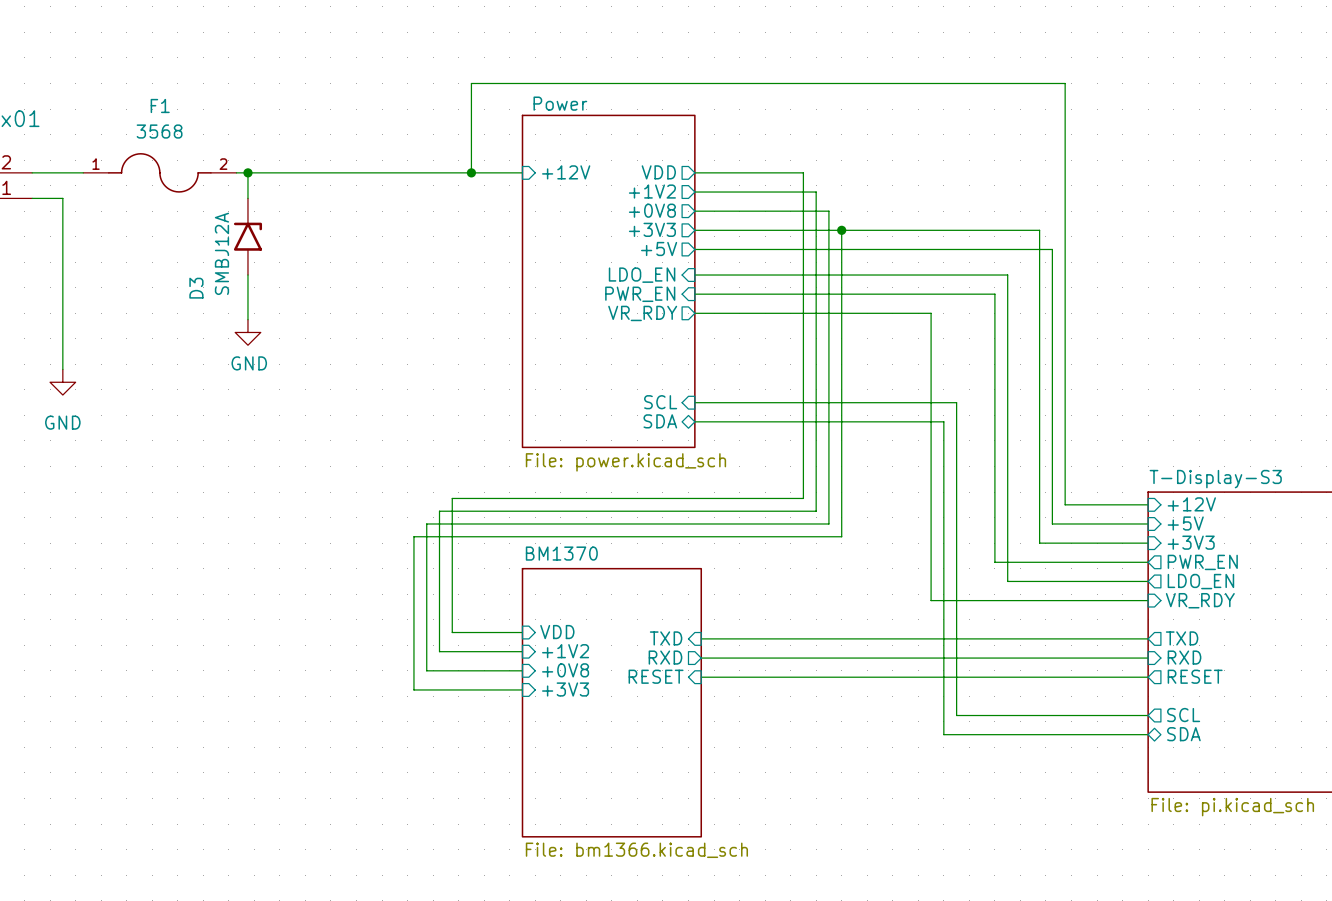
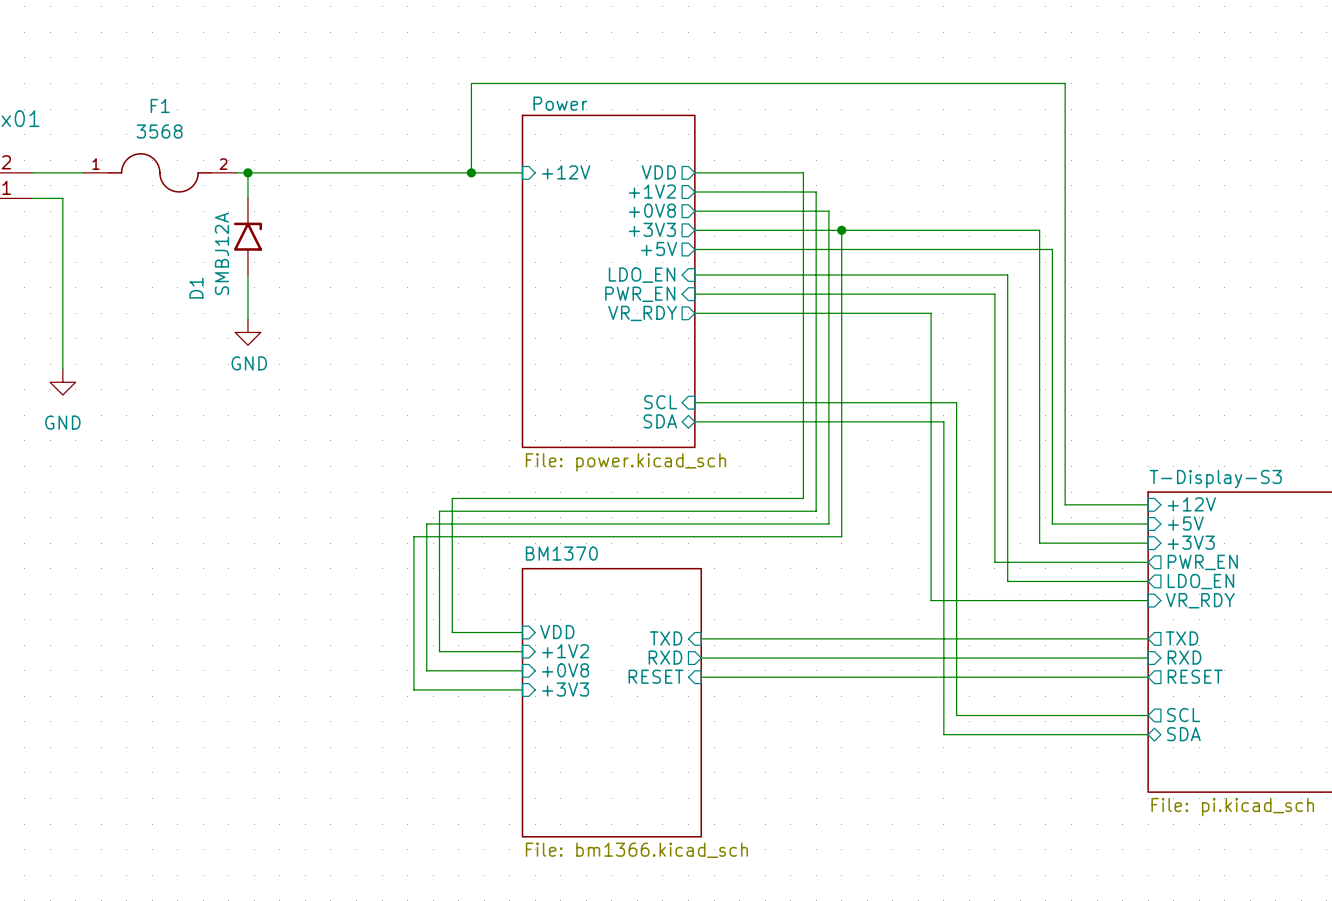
D3 name: D3 (196, 288) -> D1 (196, 288)

